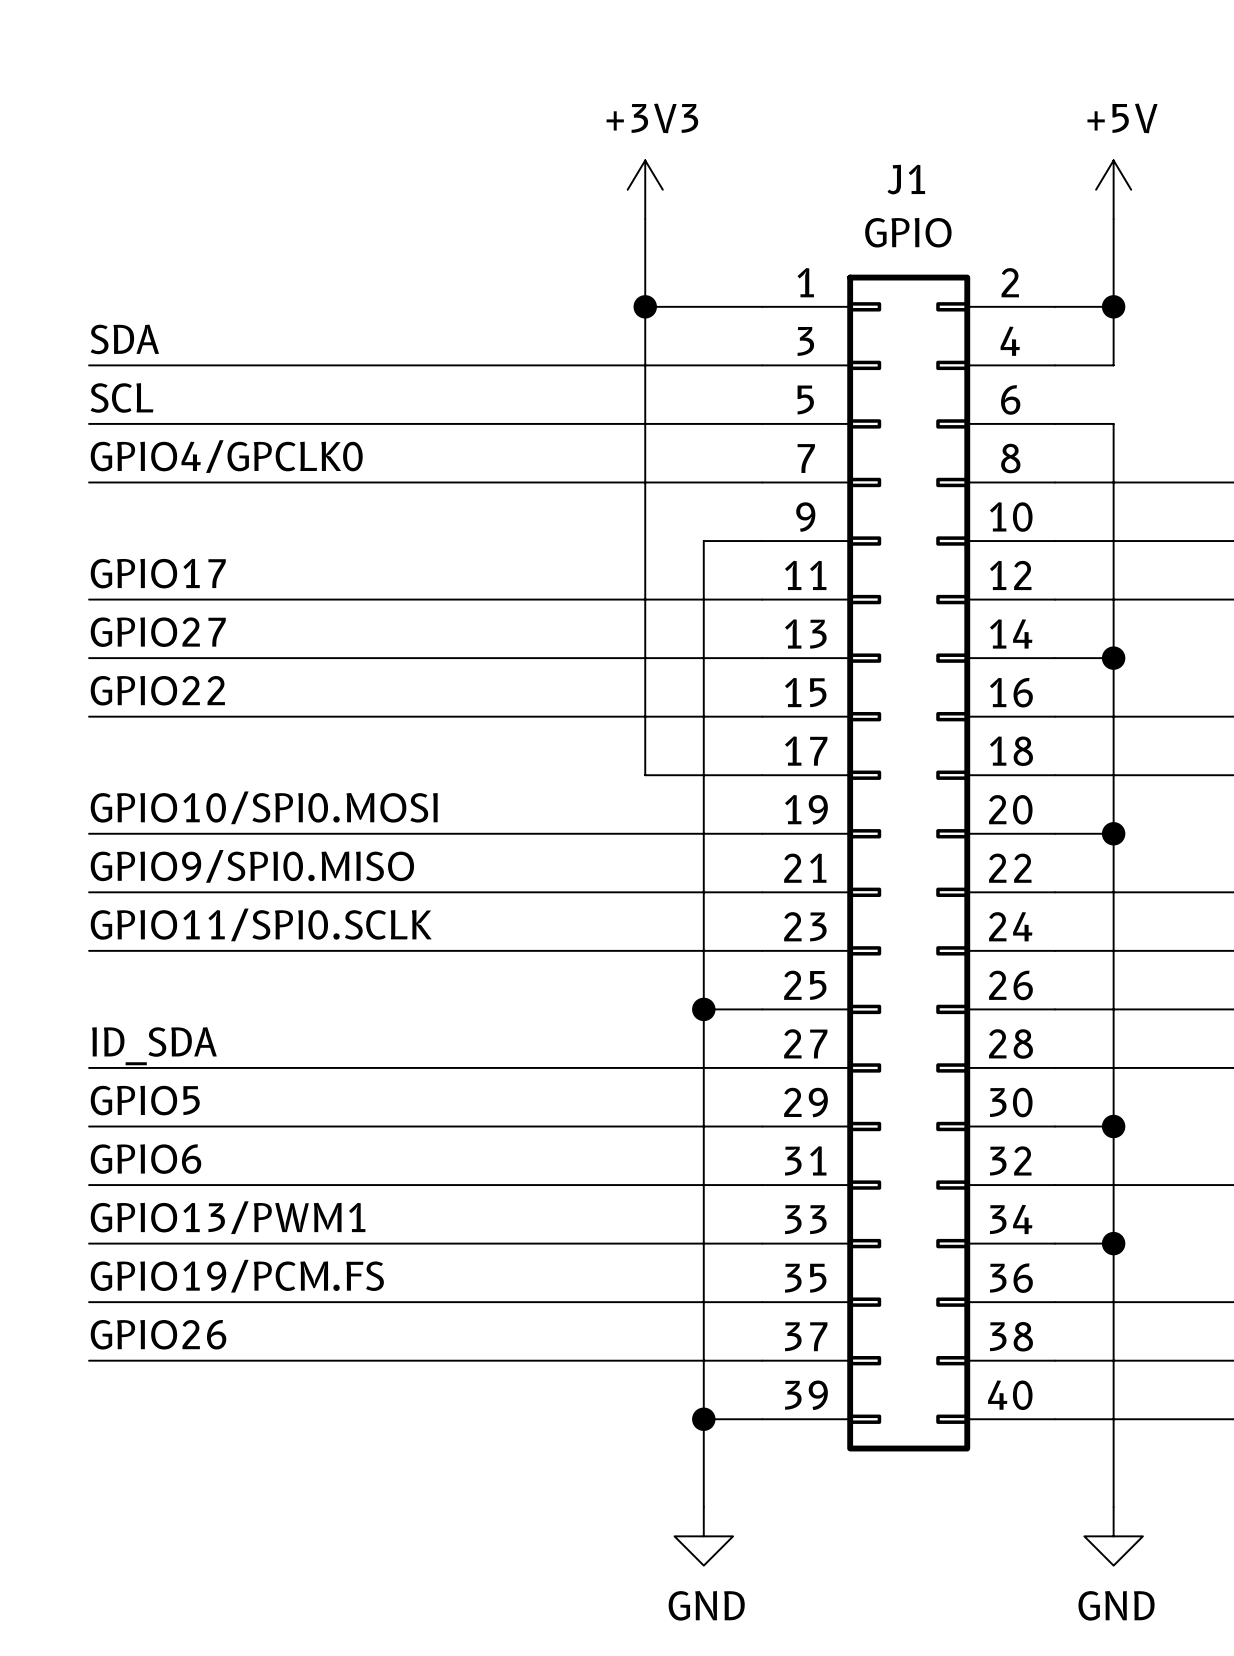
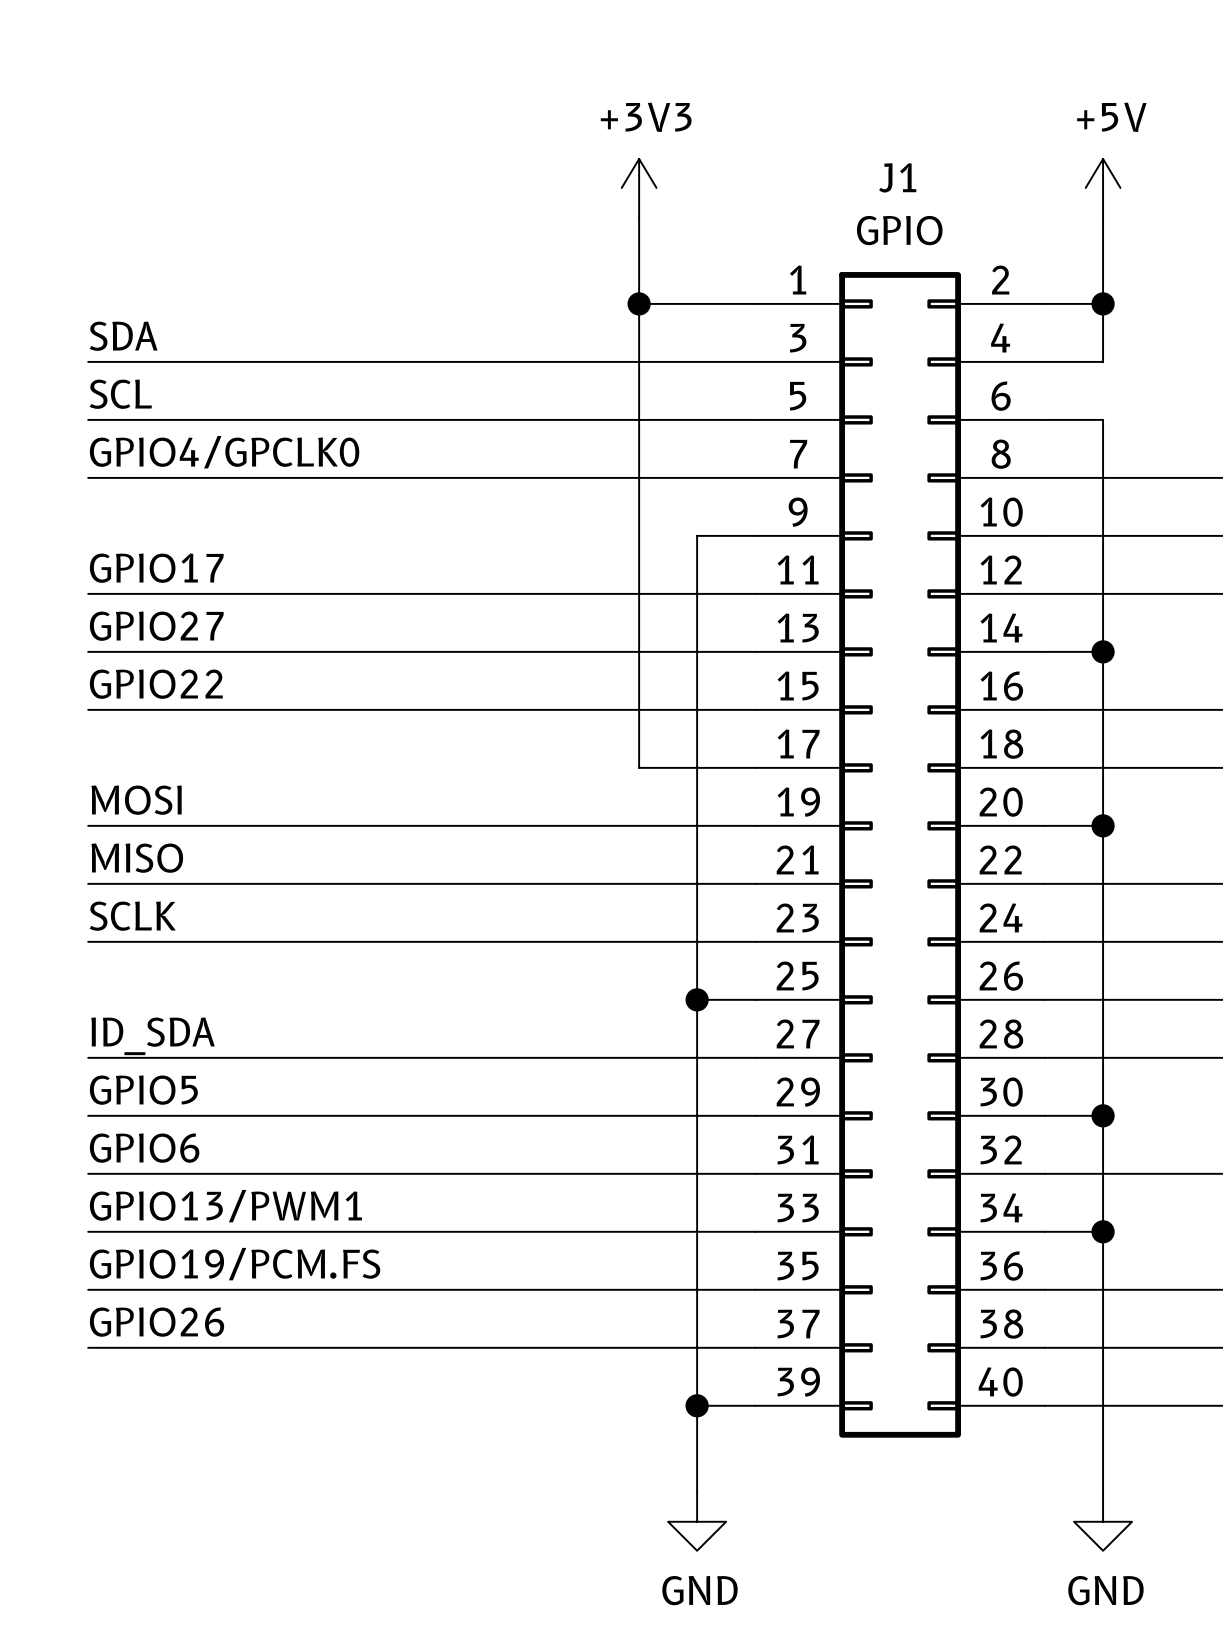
label: GPIO10/SPI0.MOSI (264, 807) -> MOSI (136, 800)
label: GPIO9/SPI0.MISO (252, 866) -> MISO (137, 858)
label: GPIO11/SPI0.SCLK (261, 924) -> SCLK (132, 916)

